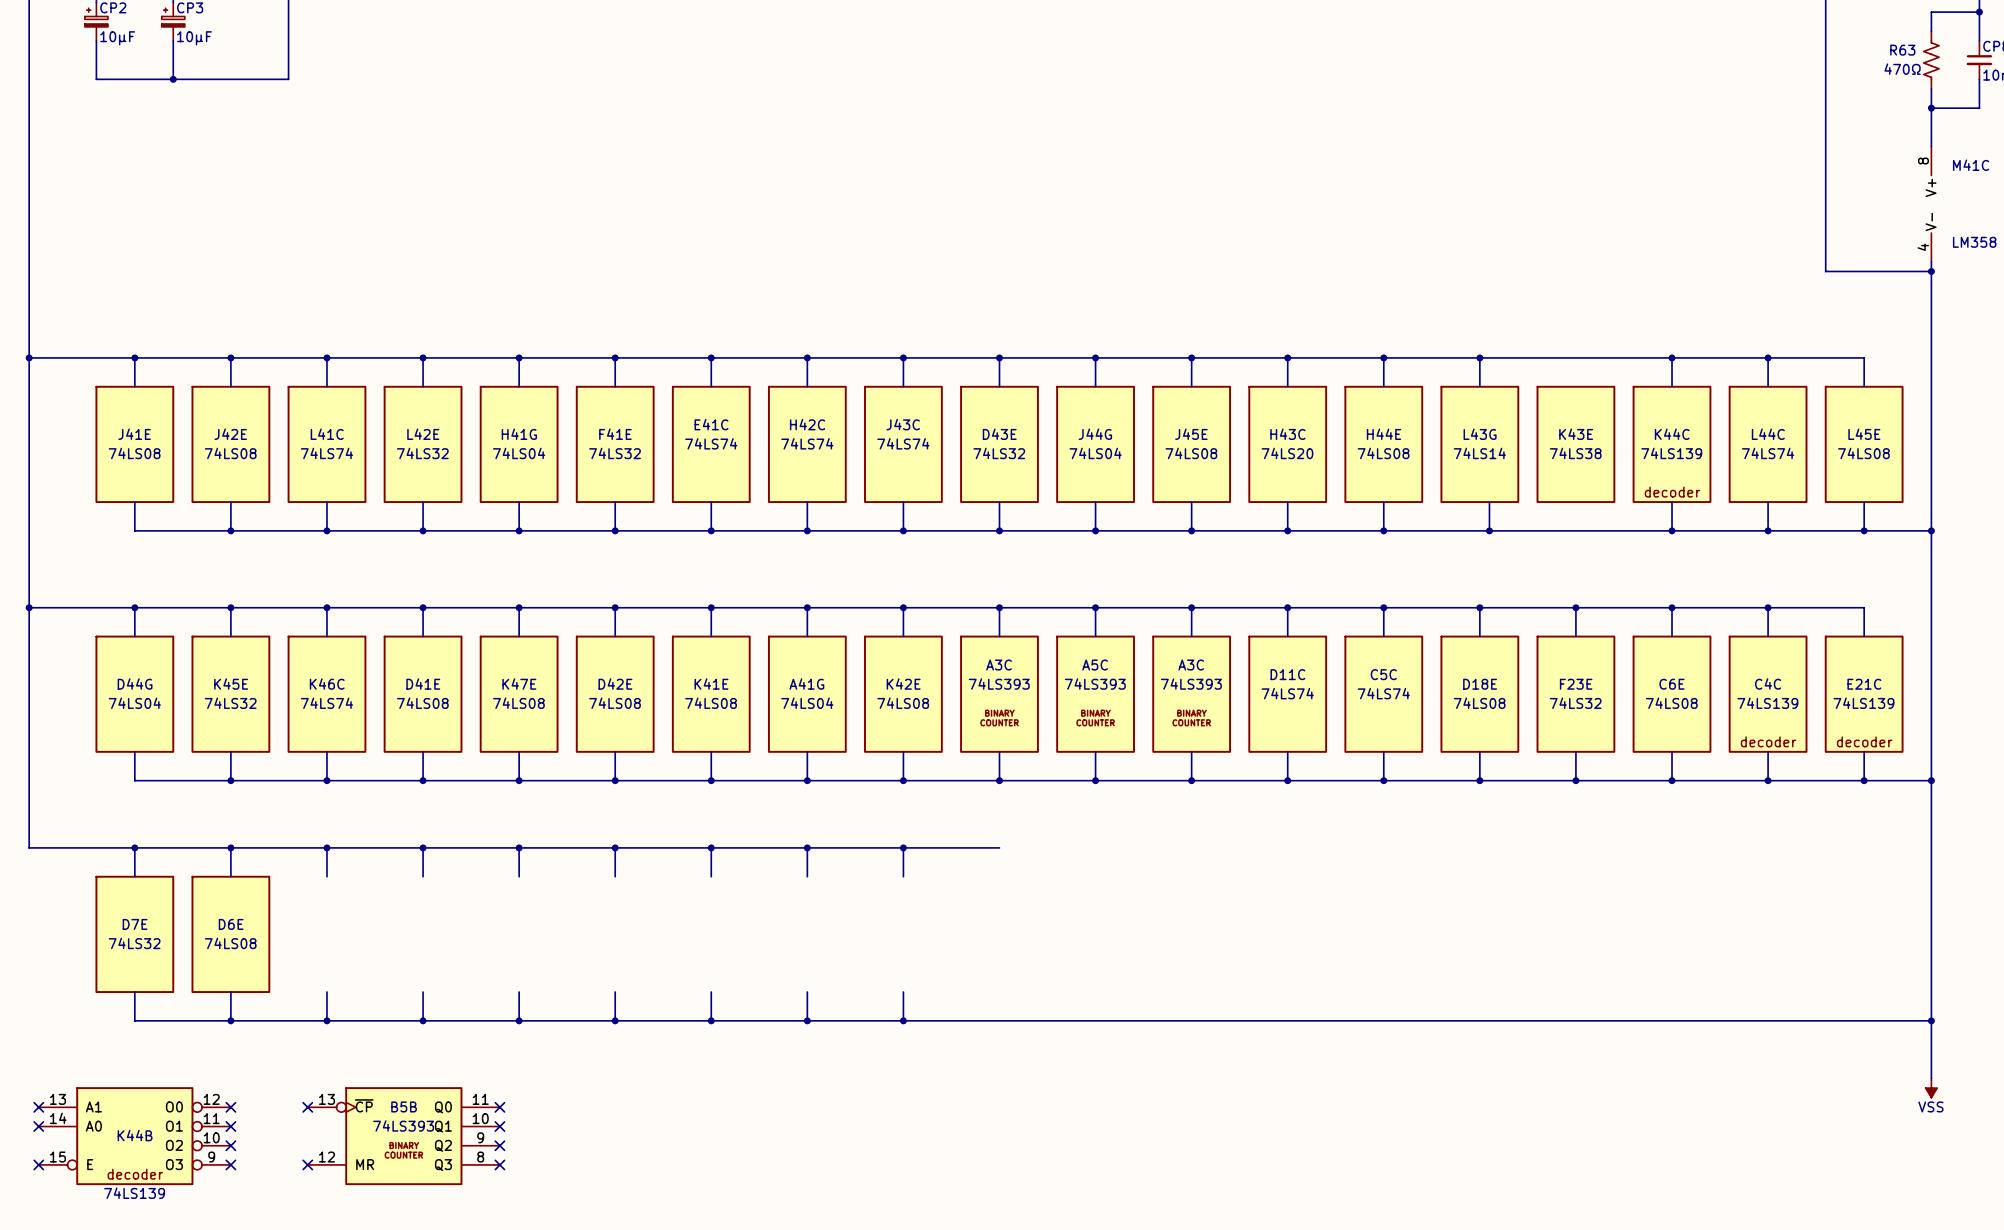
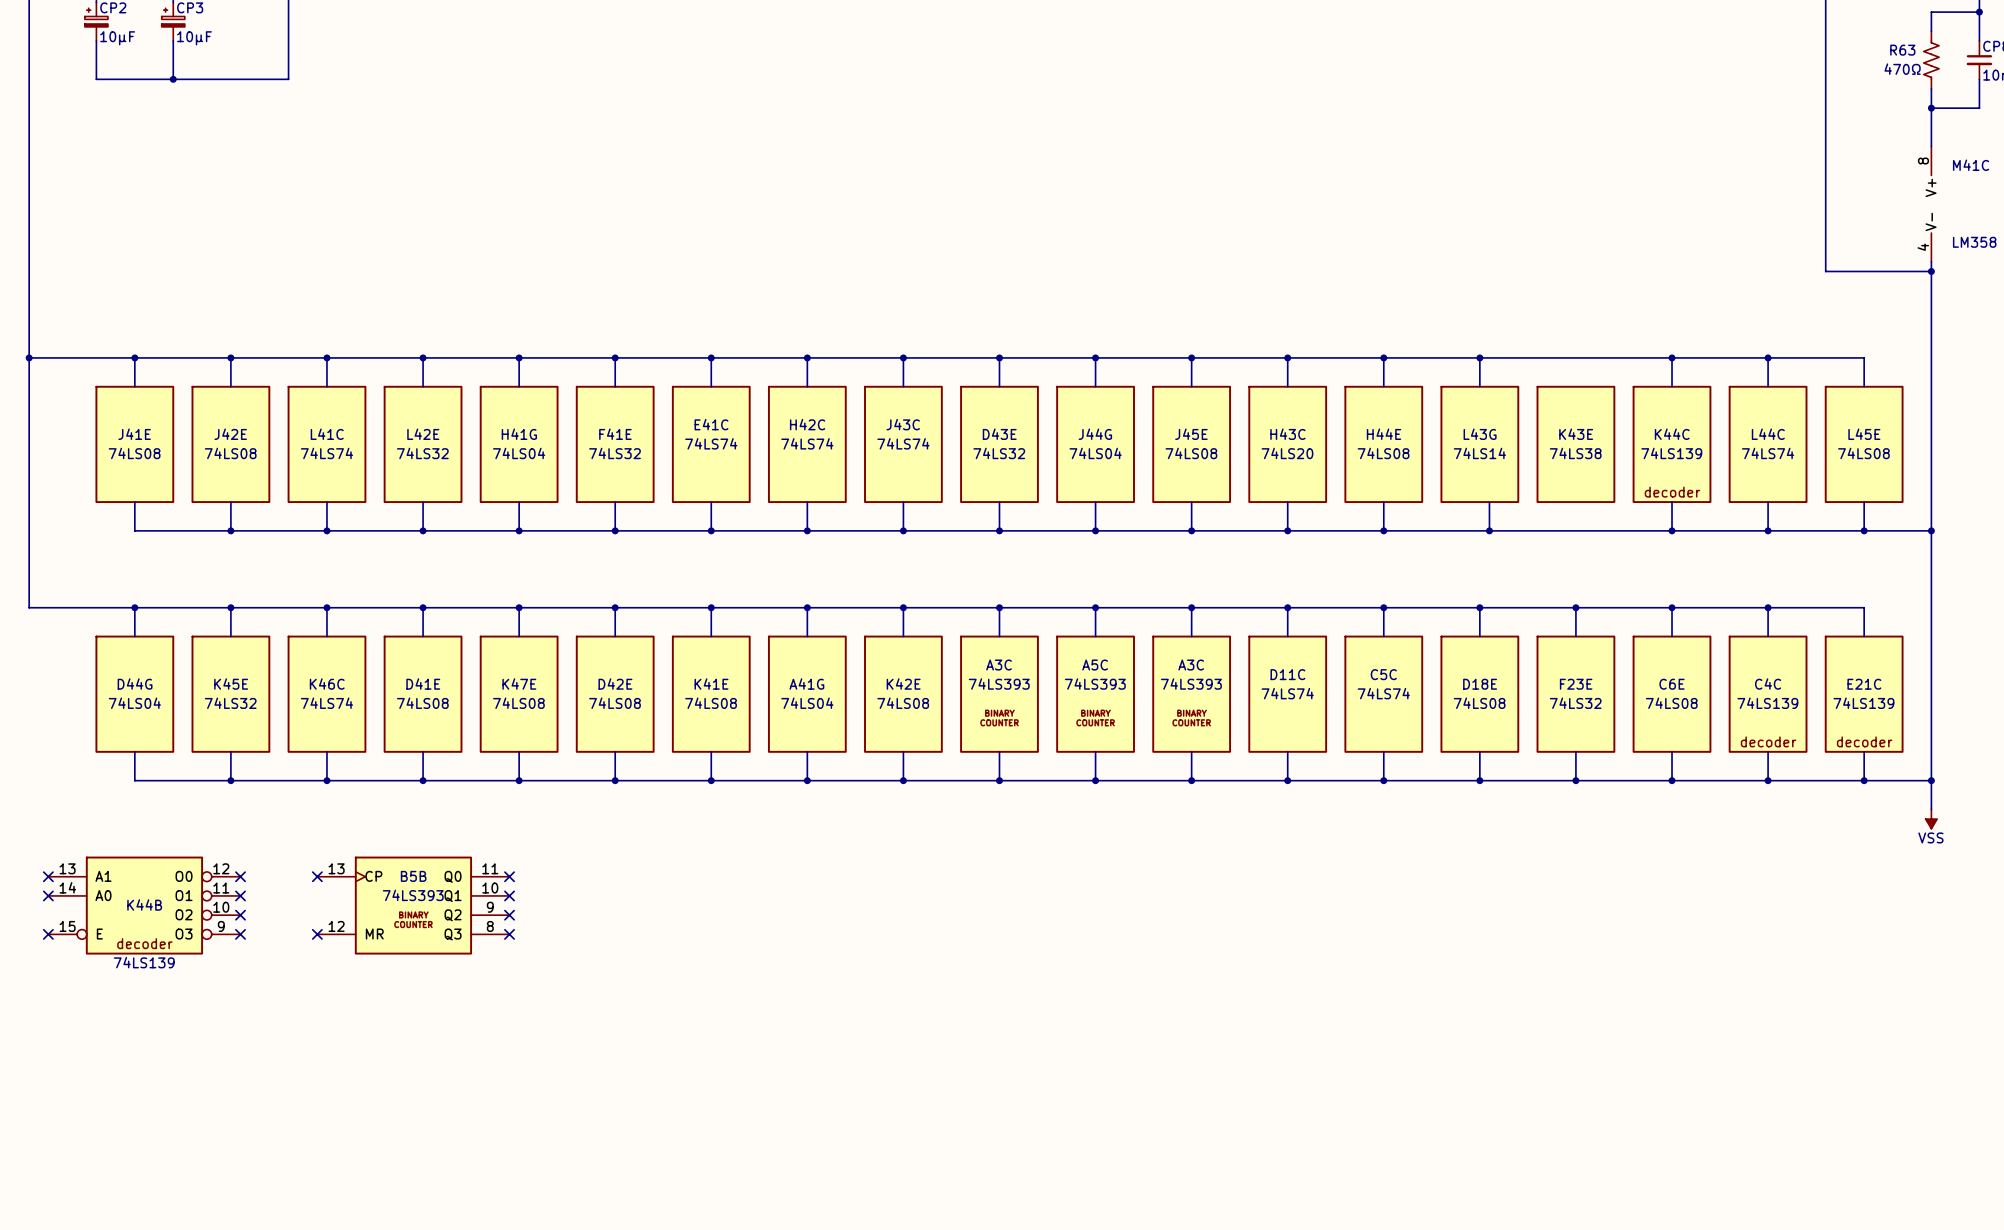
wire: (29, 607) (29, 847) (999, 847) -> none
junction: (29, 607) -> none
wire: (1931, 809) (1931, 1078) -> none
power symbol: none -> VSS (1931, 819)
junction: (134, 847) -> none
wire: (230, 847) (230, 876) -> none
junction: (230, 847) -> none
wire: (326, 847) (326, 876) -> none
junction: (326, 847) -> none
junction: (423, 847) -> none
wire: (519, 847) (519, 876) -> none
junction: (519, 847) -> none
wire: (615, 847) (615, 876) -> none
junction: (615, 847) -> none
wire: (711, 847) (711, 876) -> none
junction: (711, 847) -> none
wire: (807, 847) (807, 876) -> none
junction: (807, 847) -> none
wire: (903, 847) (903, 876) -> none
junction: (903, 847) -> none
no-connect mark: none -> (48, 876)
no-connect mark: none -> (240, 876)
no-connect mark: none -> (317, 876)
no-connect mark: none -> (509, 876)
no-connect mark: none -> (48, 895)
no-connect mark: none -> (240, 895)
no-connect mark: none -> (509, 895)
no-connect mark: none -> (240, 915)
no-connect mark: none -> (509, 915)
no-connect mark: none -> (48, 934)
D7E: 74LS32 (134, 934) -> none
D6E: 74LS08 (230, 934) -> none
no-connect mark: none -> (240, 934)
no-connect mark: none -> (317, 934)
no-connect mark: none -> (509, 934)
wire: (134, 992) (134, 1020) (1931, 1020) -> none
wire: (230, 992) (230, 1020) -> none
wire: (326, 992) (326, 1020) -> none
wire: (423, 992) (423, 1020) -> none
wire: (519, 992) (519, 1020) -> none
wire: (615, 992) (615, 1020) -> none
wire: (711, 992) (711, 1020) -> none
wire: (807, 992) (807, 1020) -> none
wire: (903, 992) (903, 1020) -> none
junction: (230, 1020) -> none
junction: (326, 1020) -> none
junction: (423, 1020) -> none
junction: (519, 1020) -> none
junction: (615, 1020) -> none
junction: (711, 1020) -> none
junction: (807, 1020) -> none
junction: (903, 1020) -> none
junction: (1931, 1020) -> none
B5B symbol: [307, 1087, 500, 1186] -> [317, 856, 510, 955]
power symbol: VSS (1931, 1088) -> none
no-connect mark: (38, 1107) -> none
no-connect mark: (230, 1107) -> none
no-connect mark: (307, 1107) -> none
no-connect mark: (499, 1107) -> none
no-connect mark: (38, 1126) -> none
no-connect mark: (230, 1126) -> none
no-connect mark: (499, 1126) -> none
K44B position: (134, 1136) -> (144, 905)
no-connect mark: (230, 1145) -> none
no-connect mark: (499, 1145) -> none
no-connect mark: (38, 1164) -> none
no-connect mark: (230, 1164) -> none
no-connect mark: (307, 1164) -> none
no-connect mark: (499, 1164) -> none

